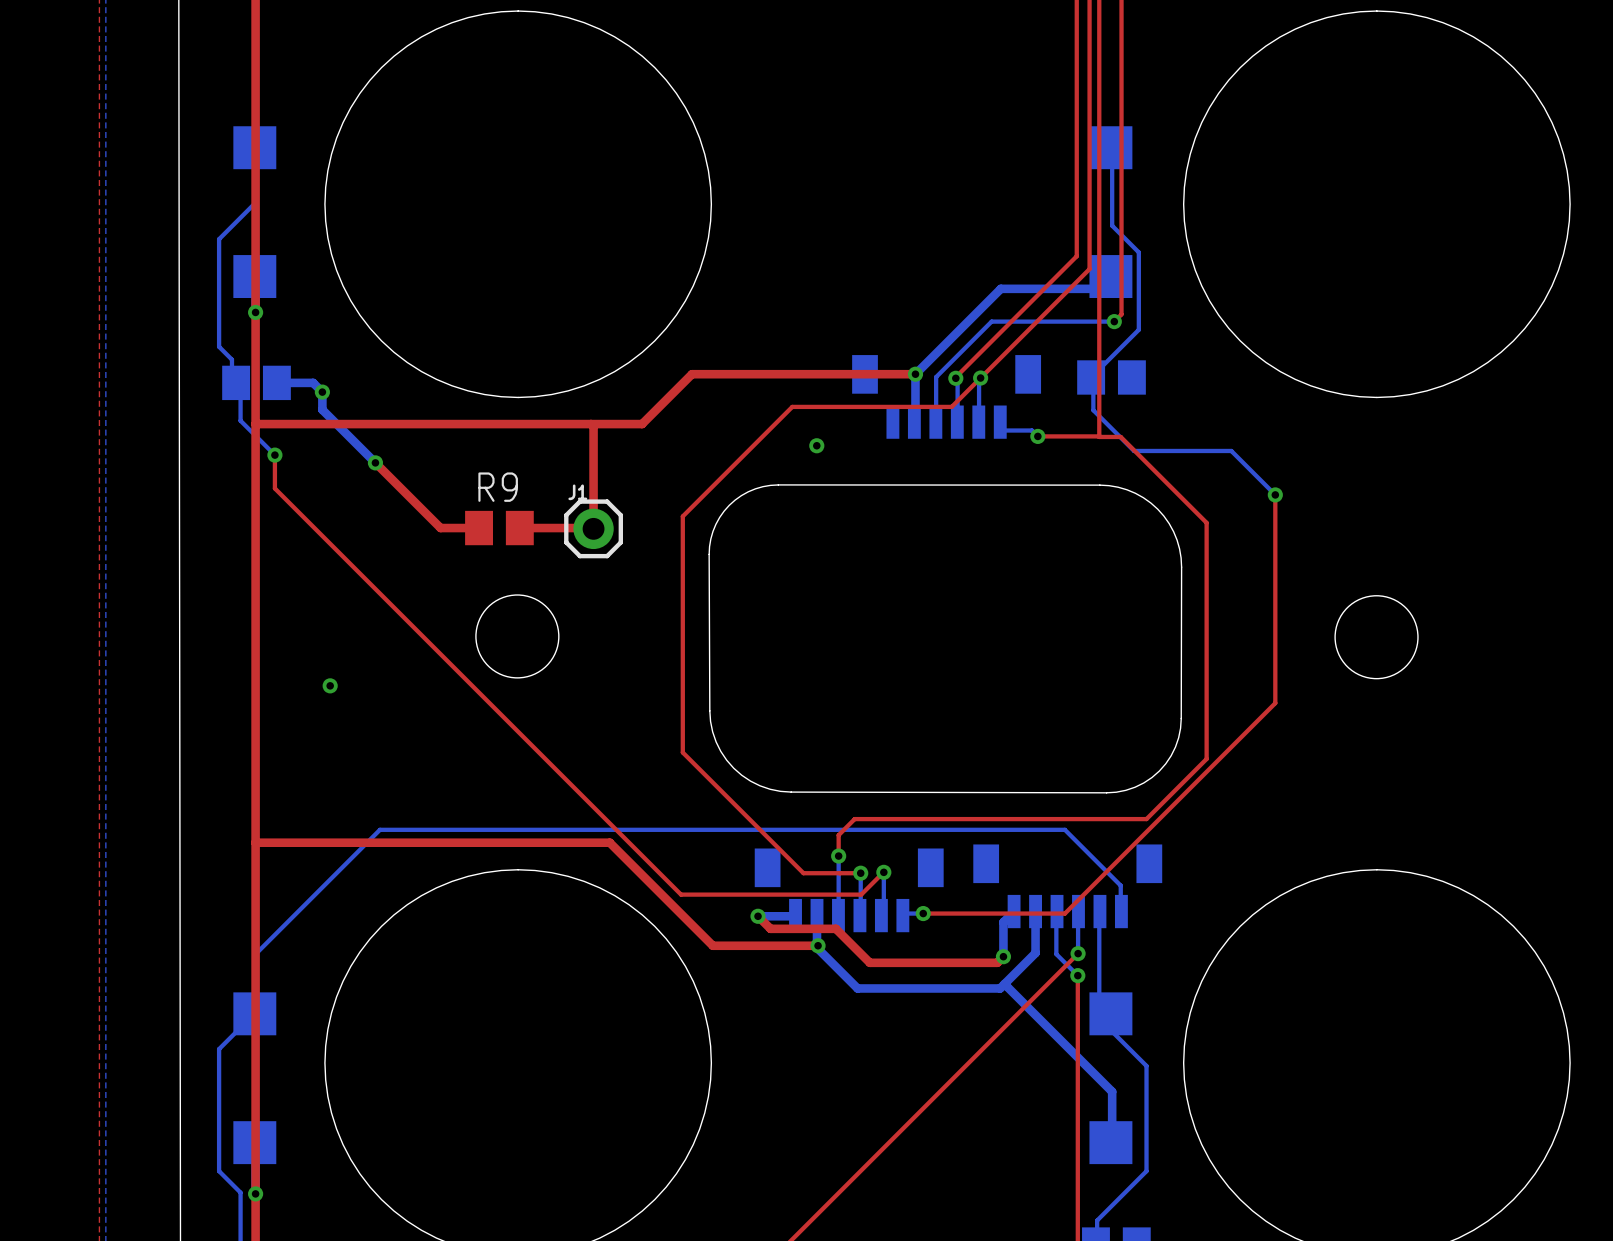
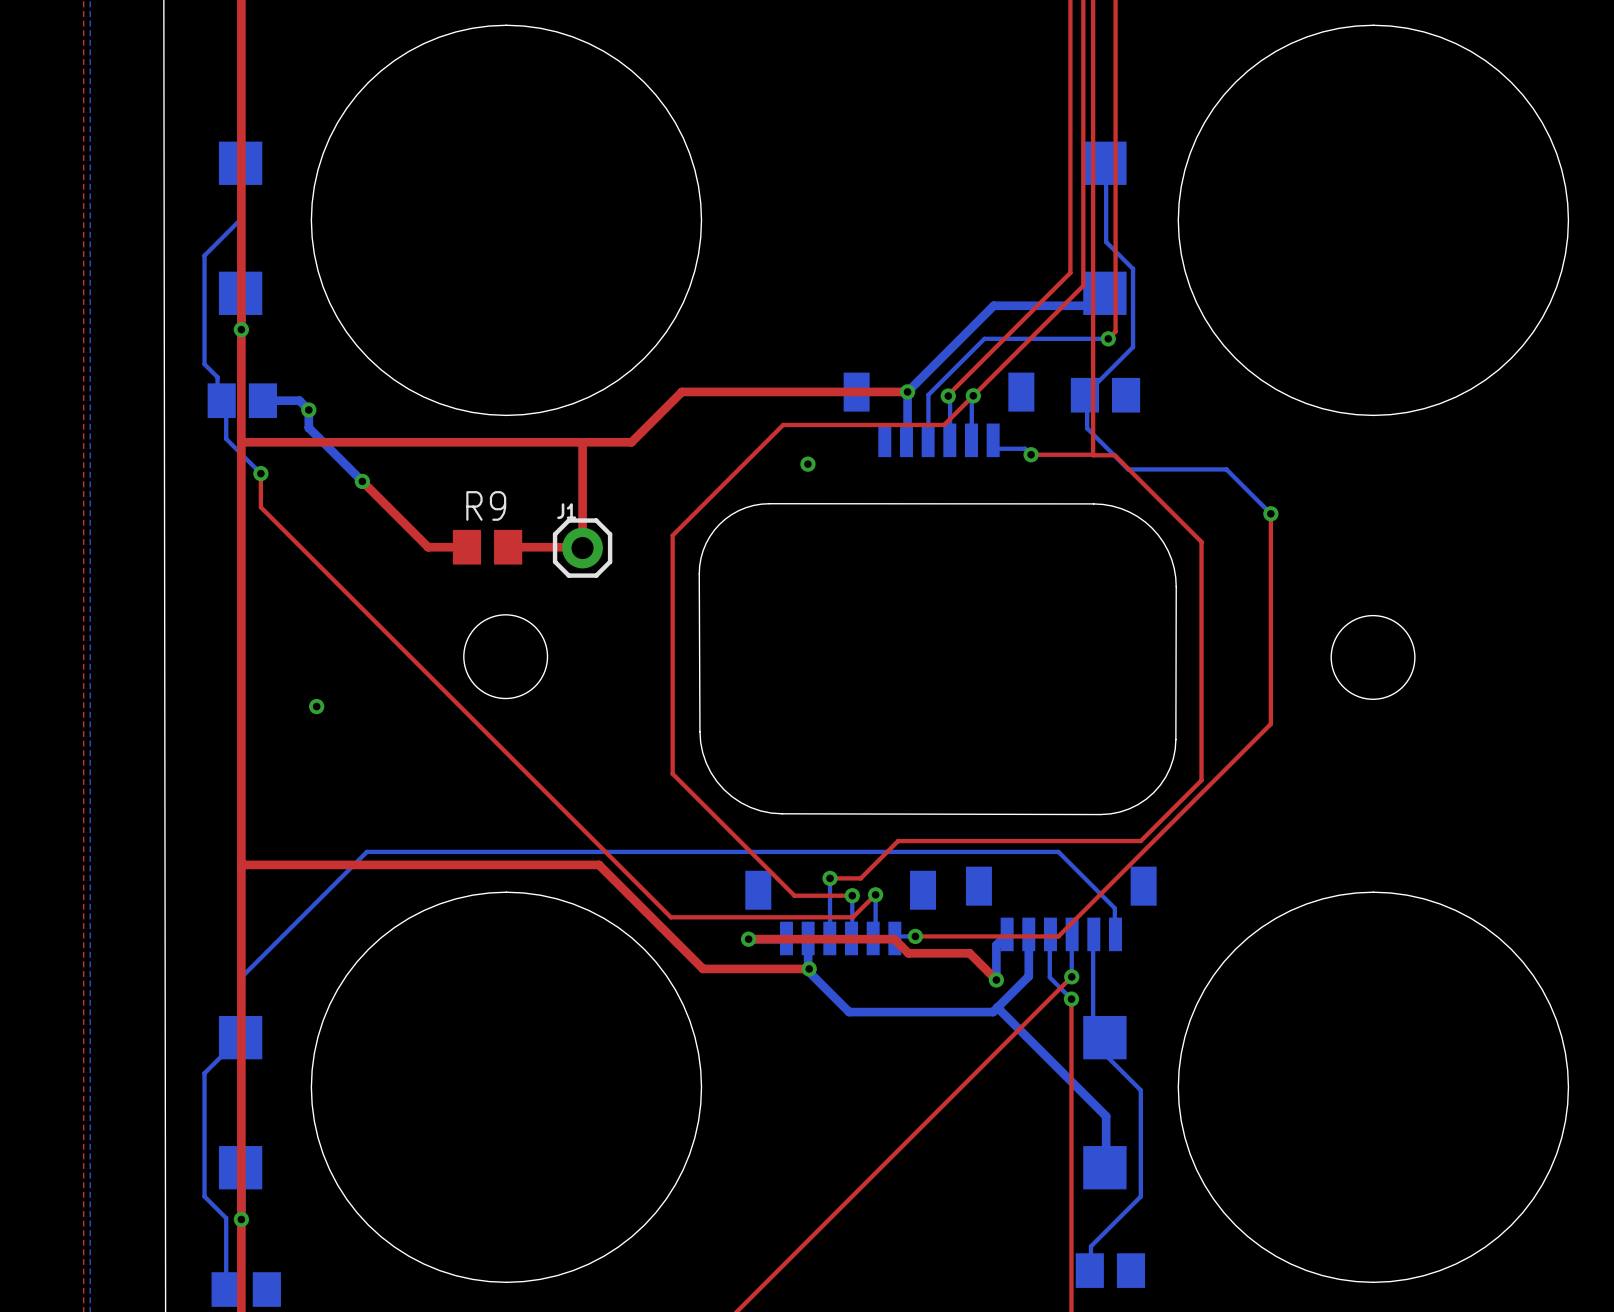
top track: (906, 819) (854, 819) (838, 835) (838, 856) -> (898, 841) (860, 878) (830, 878)
top track: (758, 916) (770, 928) (835, 928) (869, 962) (997, 962) (1003, 956) -> (748, 939) (894, 939) (908, 953) (969, 953) (996, 979)

